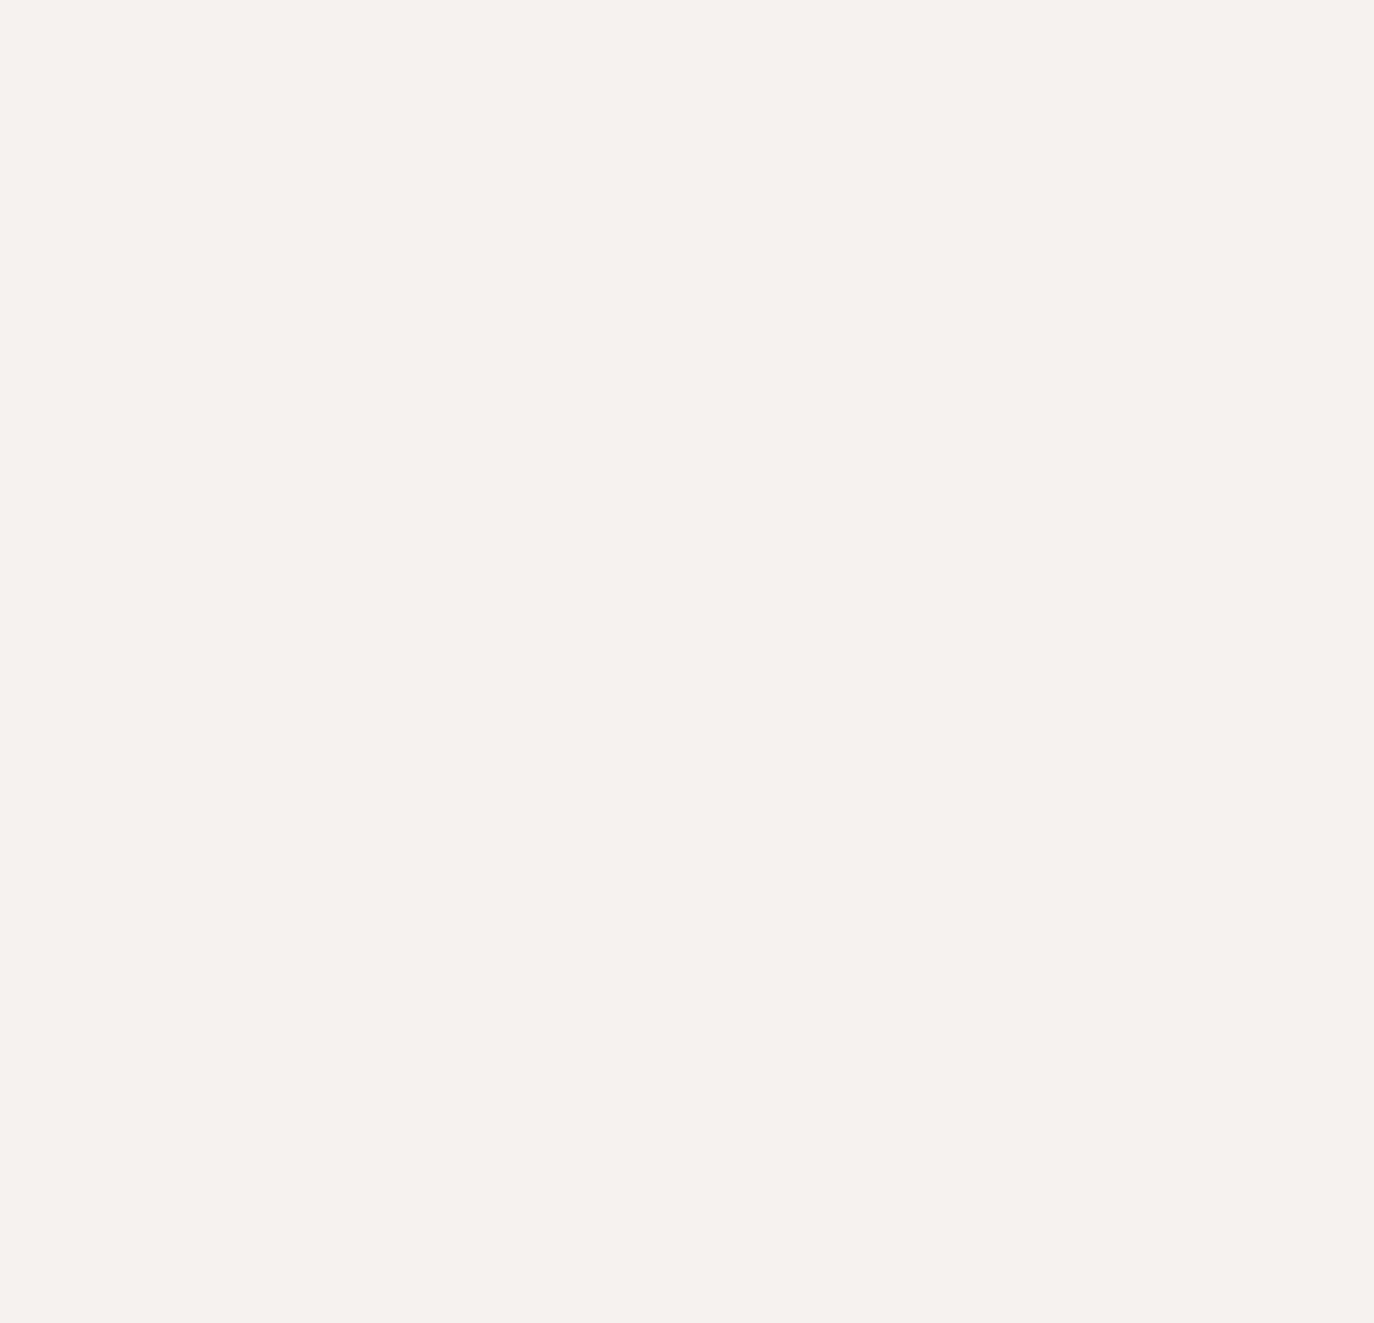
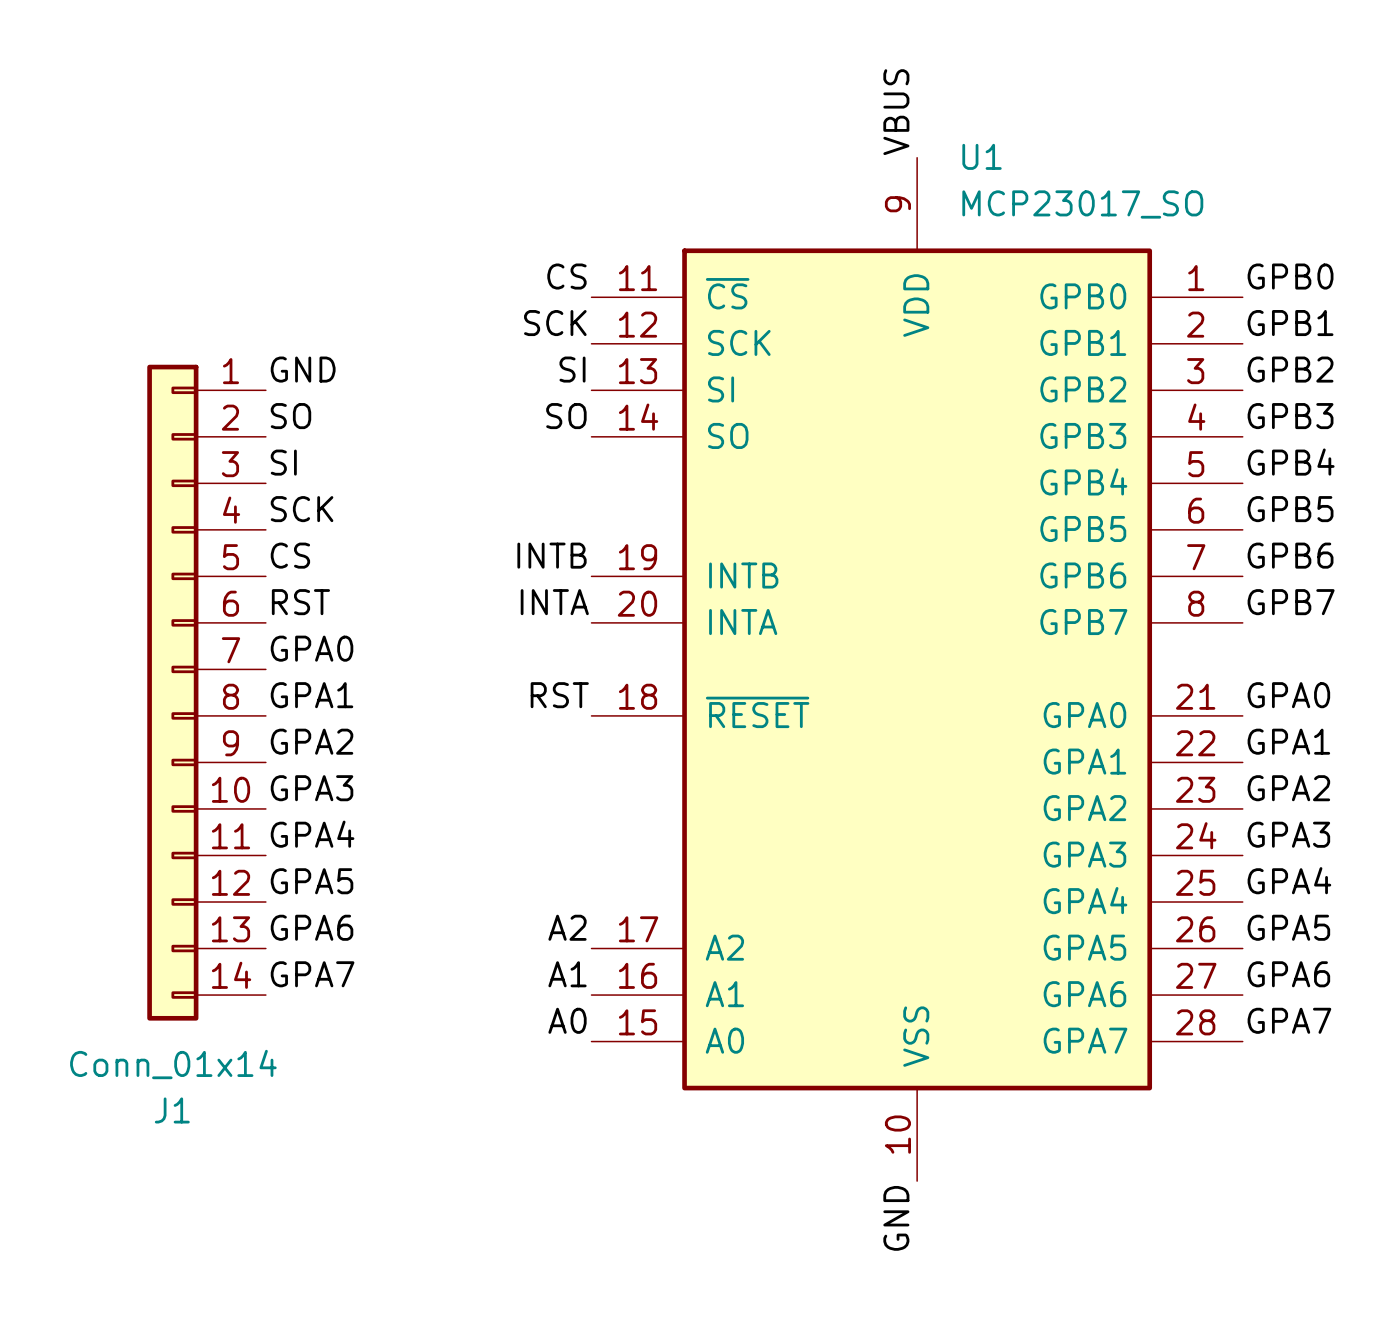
label: none -> VBUS (896, 112)
label: none -> CS (566, 276)
label: none -> GPB0 (1290, 276)
label: none -> SCK (555, 323)
label: none -> GPB1 (1290, 323)
label: none -> GND (303, 369)
label: none -> SI (572, 369)
label: none -> GPB2 (1290, 369)
label: none -> SO (290, 416)
label: none -> SO (566, 416)
label: none -> GPB3 (1290, 416)
label: none -> SI (283, 462)
label: none -> GPB4 (1291, 462)
label: none -> SCK (302, 509)
label: none -> GPB5 (1290, 509)
label: none -> CS (290, 555)
label: none -> INTB (552, 555)
label: none -> GPB6 (1290, 555)
label: none -> RST (300, 602)
label: none -> INTA (554, 602)
label: none -> GPB7 (1291, 602)
label: none -> GPA0 (312, 648)
U1: none -> MCP23017_SO (917, 669)
J1: none -> Conn_01x14 (206, 692)
label: none -> GPA1 (312, 695)
label: none -> RST (559, 695)
label: none -> GPA0 (1288, 695)
label: none -> GPA2 (312, 741)
label: none -> GPA1 (1288, 741)
label: none -> GPA3 (312, 788)
label: none -> GPA2 (1288, 788)
label: none -> GPA4 (312, 834)
label: none -> GPA3 (1288, 834)
label: none -> GPA4 (1289, 880)
label: none -> GPA5 (312, 881)
label: none -> GPA6 (312, 927)
label: none -> A2 (567, 927)
label: none -> GPA5 (1288, 927)
label: none -> GPA7 (312, 974)
label: none -> A1 (567, 974)
label: none -> GPA6 (1288, 974)
label: none -> A0 (567, 1020)
label: none -> GPA7 (1289, 1020)
label: none -> GND (896, 1218)

